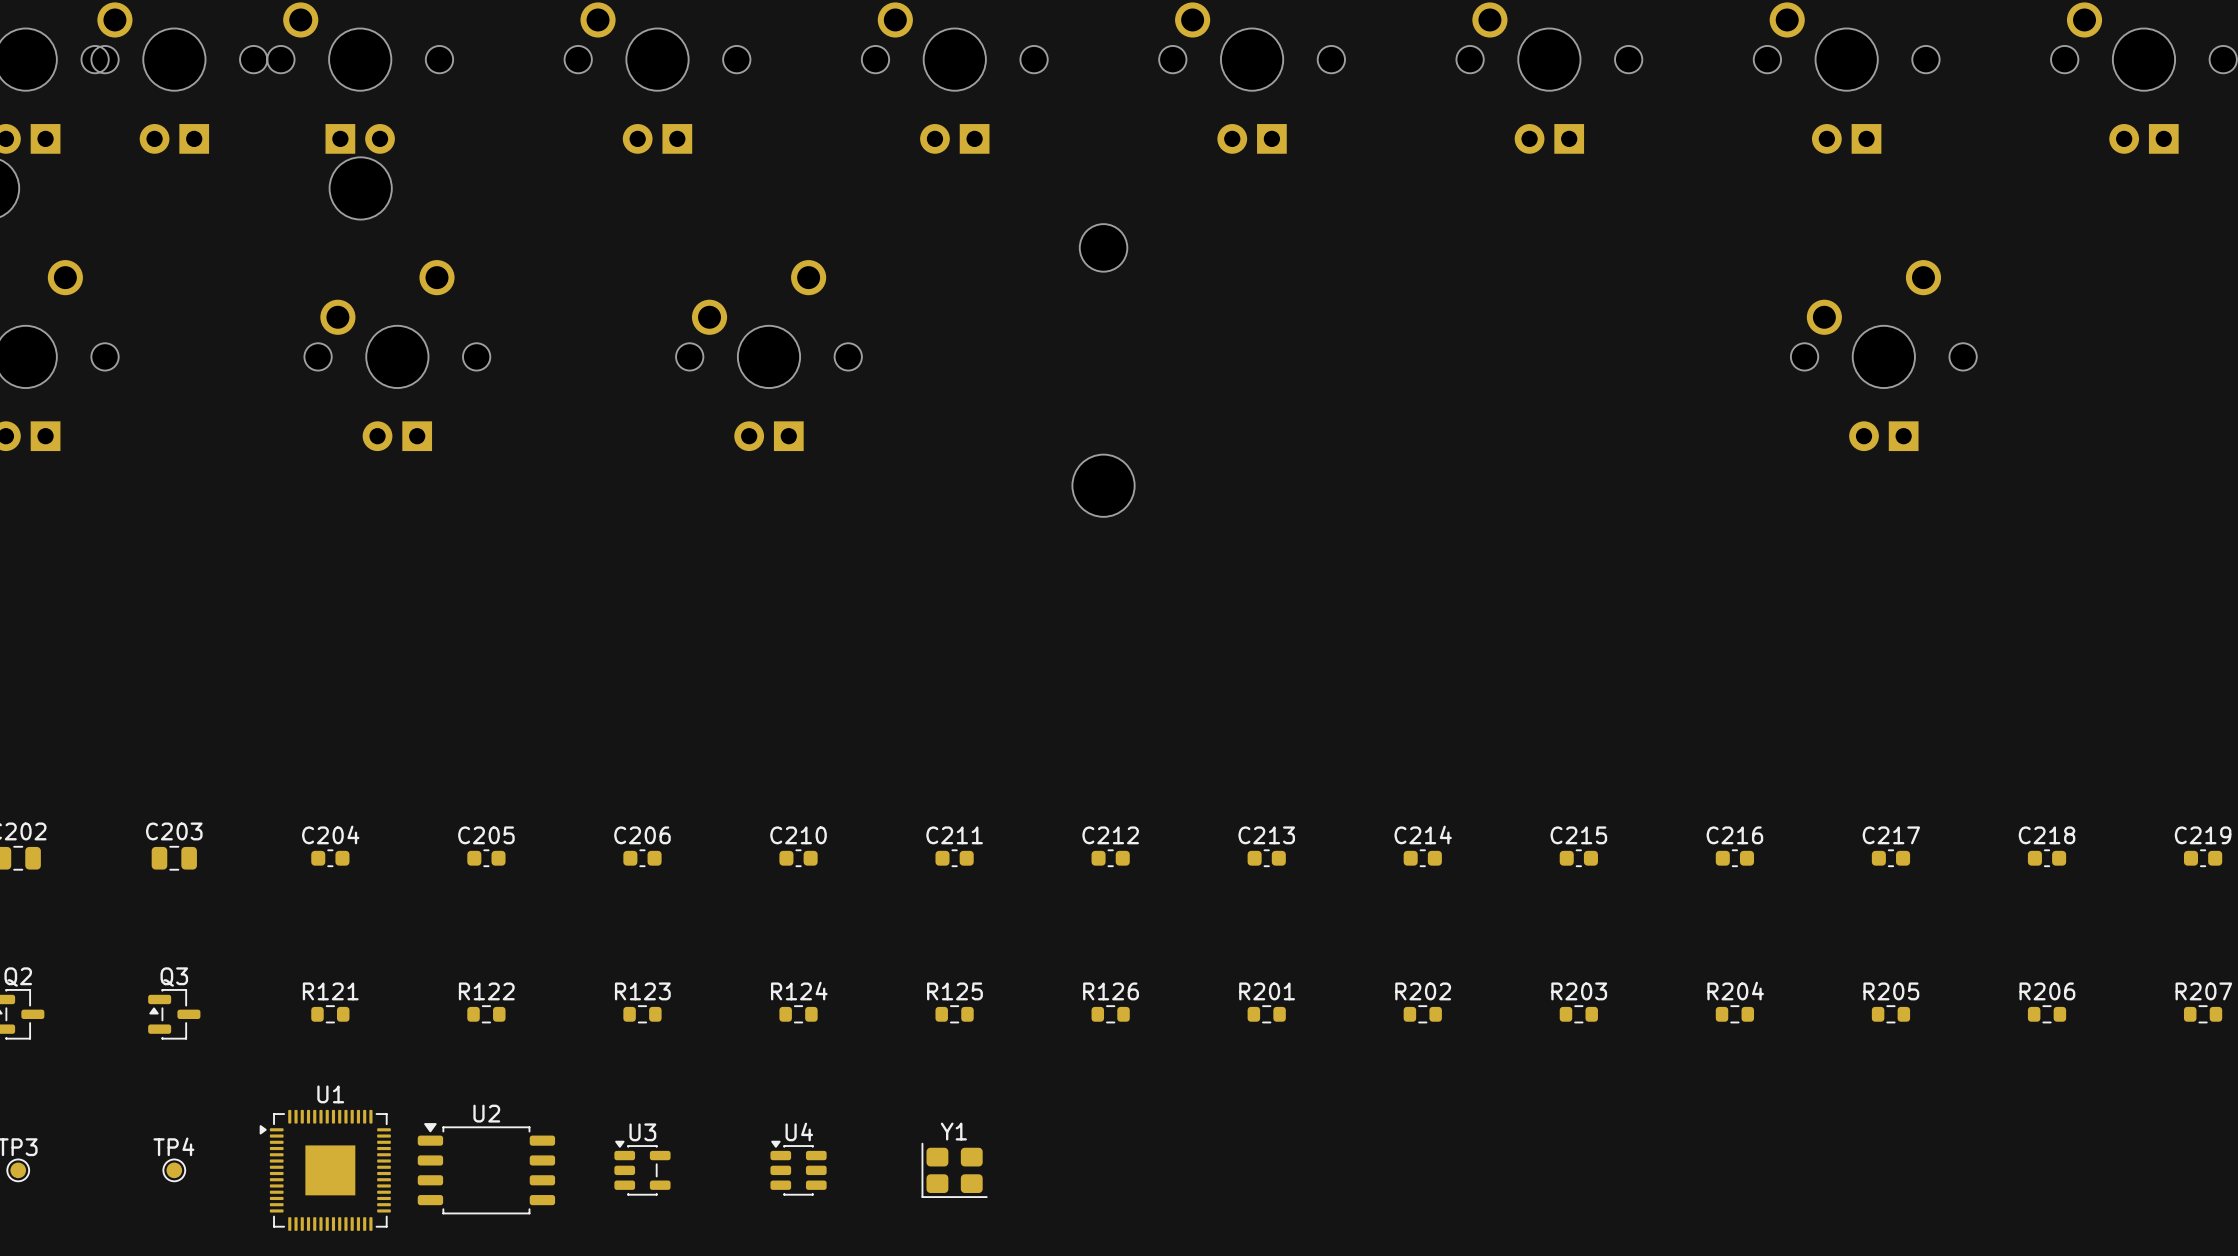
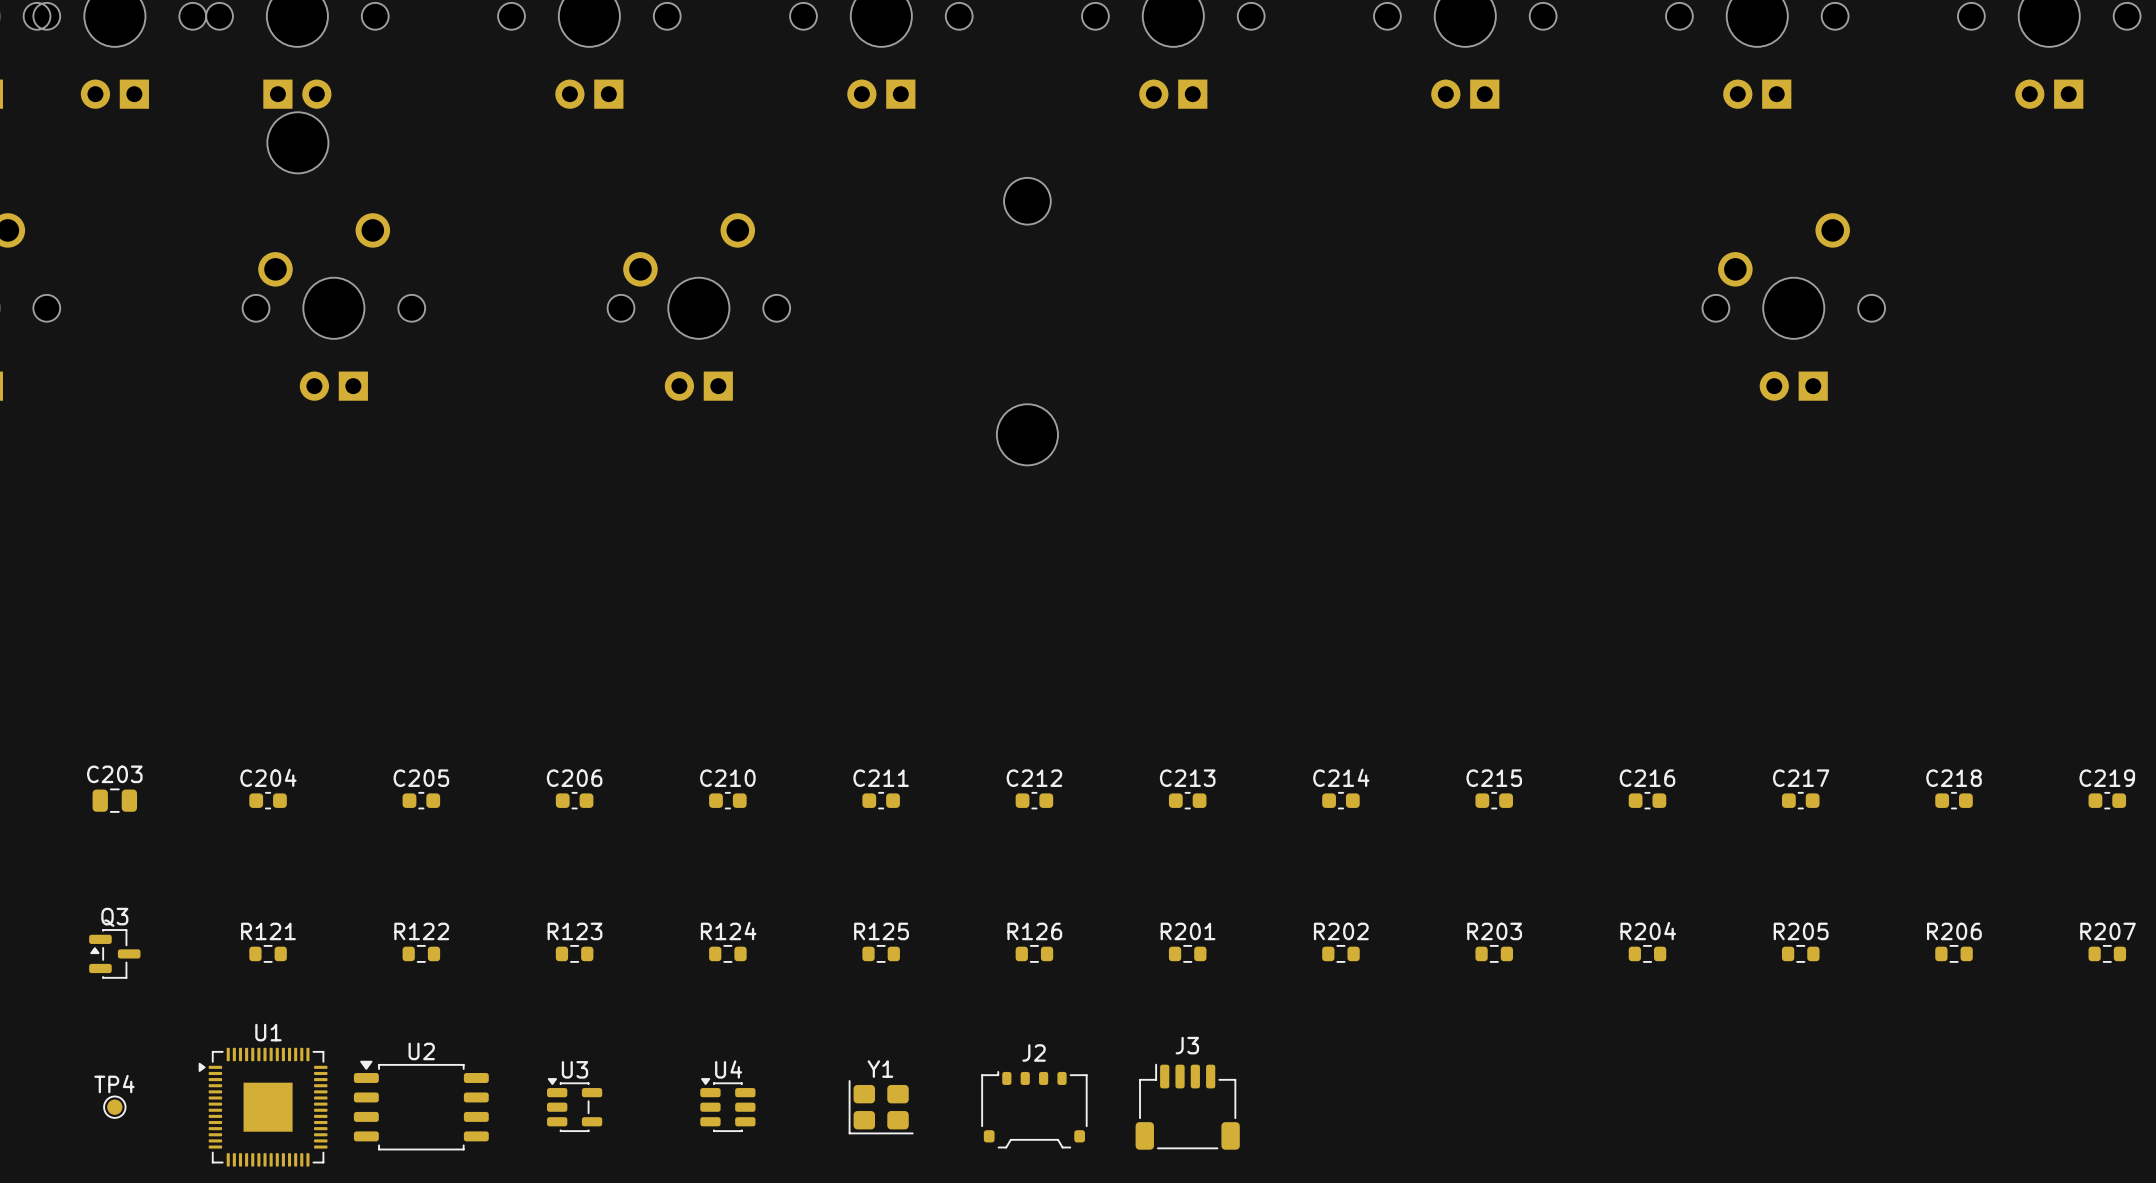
J3: none -> (1187, 1106)
J2: none -> (1034, 1109)

